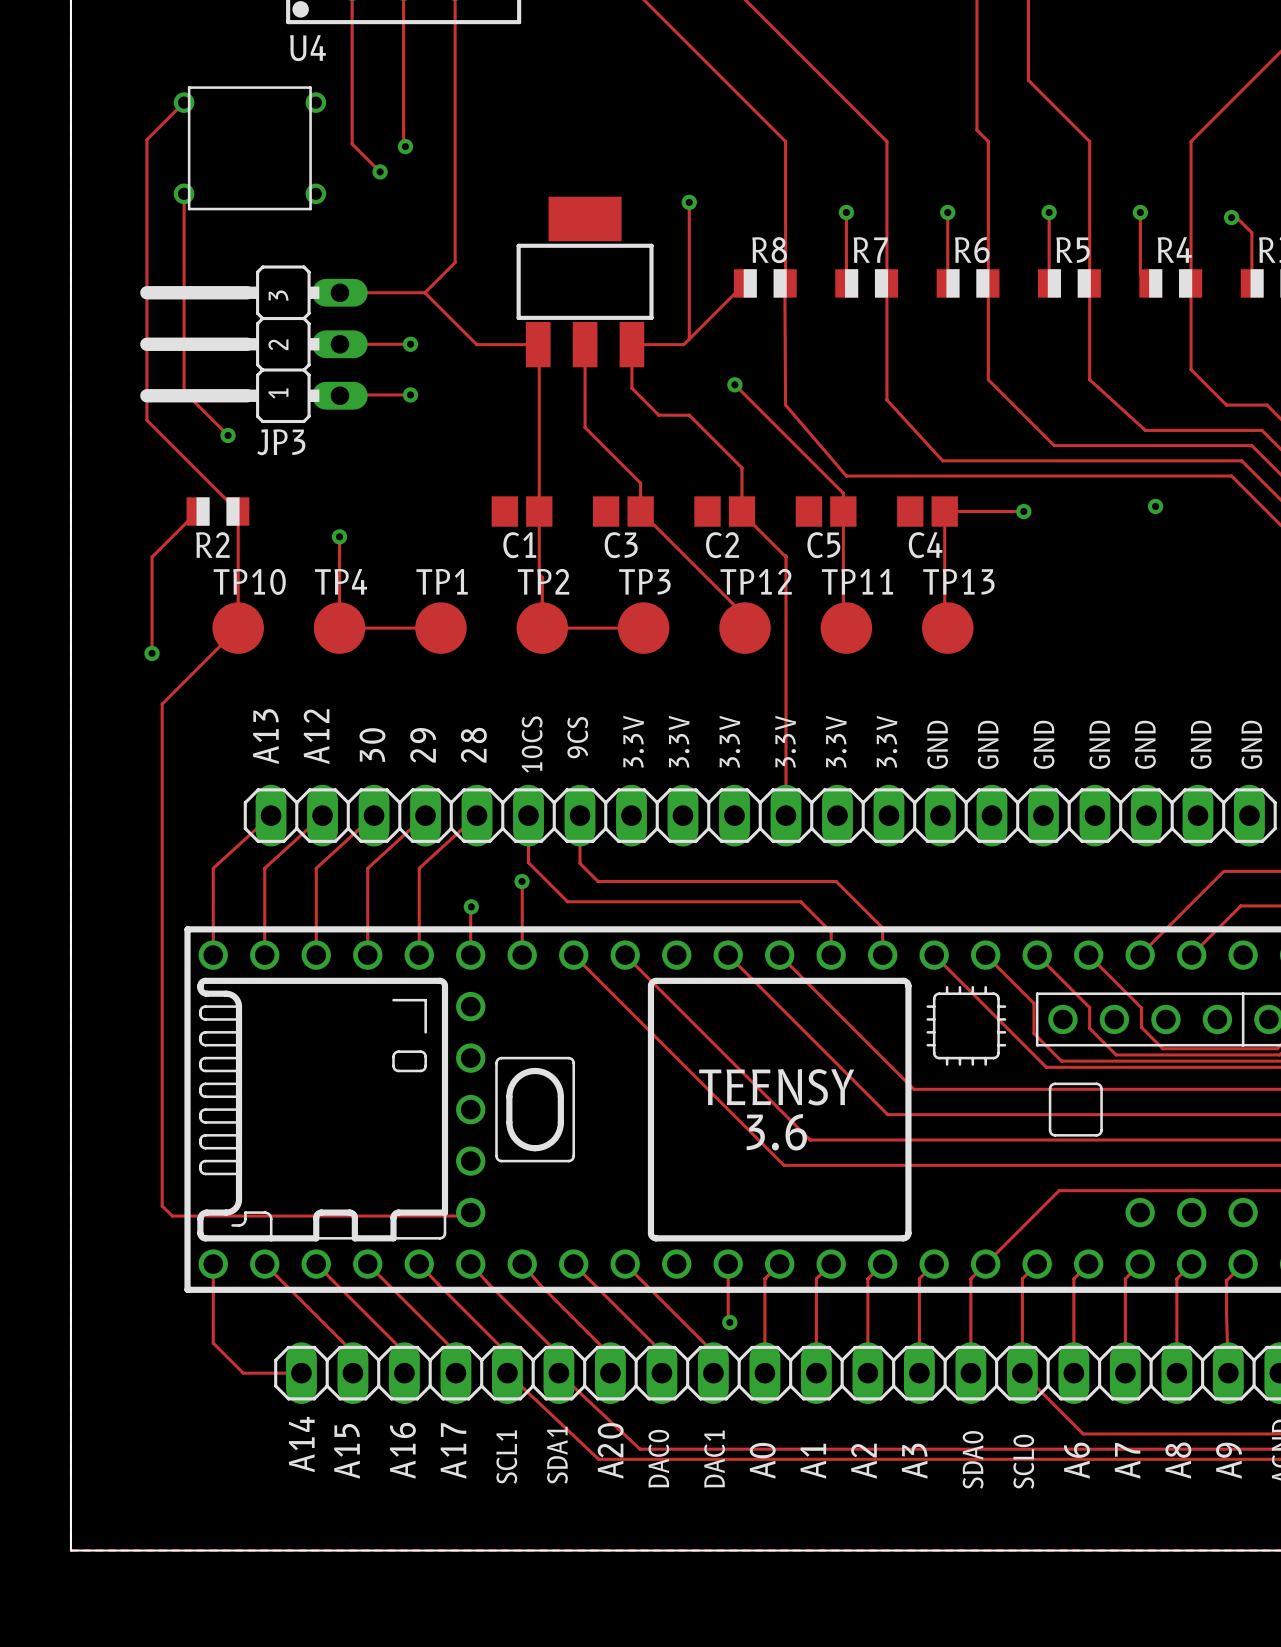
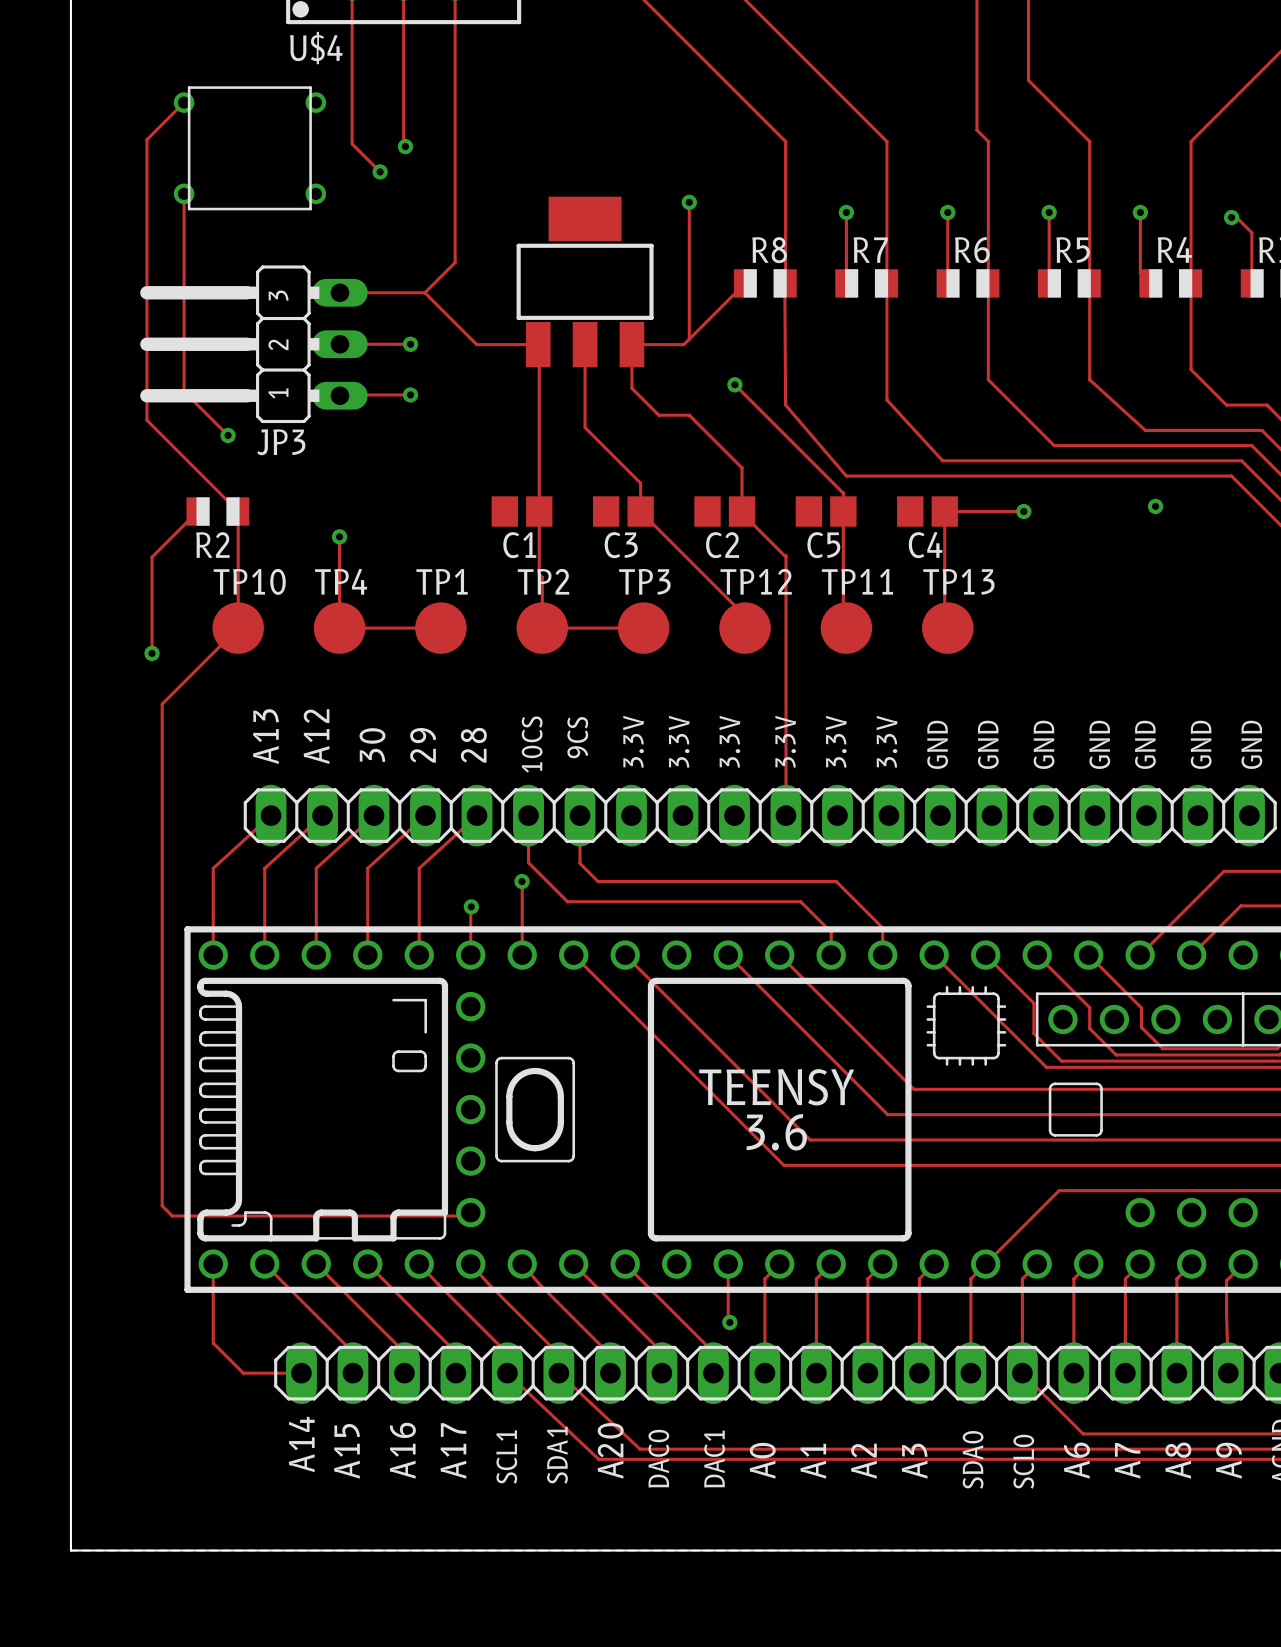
U4 name: U4 (307, 48) -> U$4 (316, 47)

